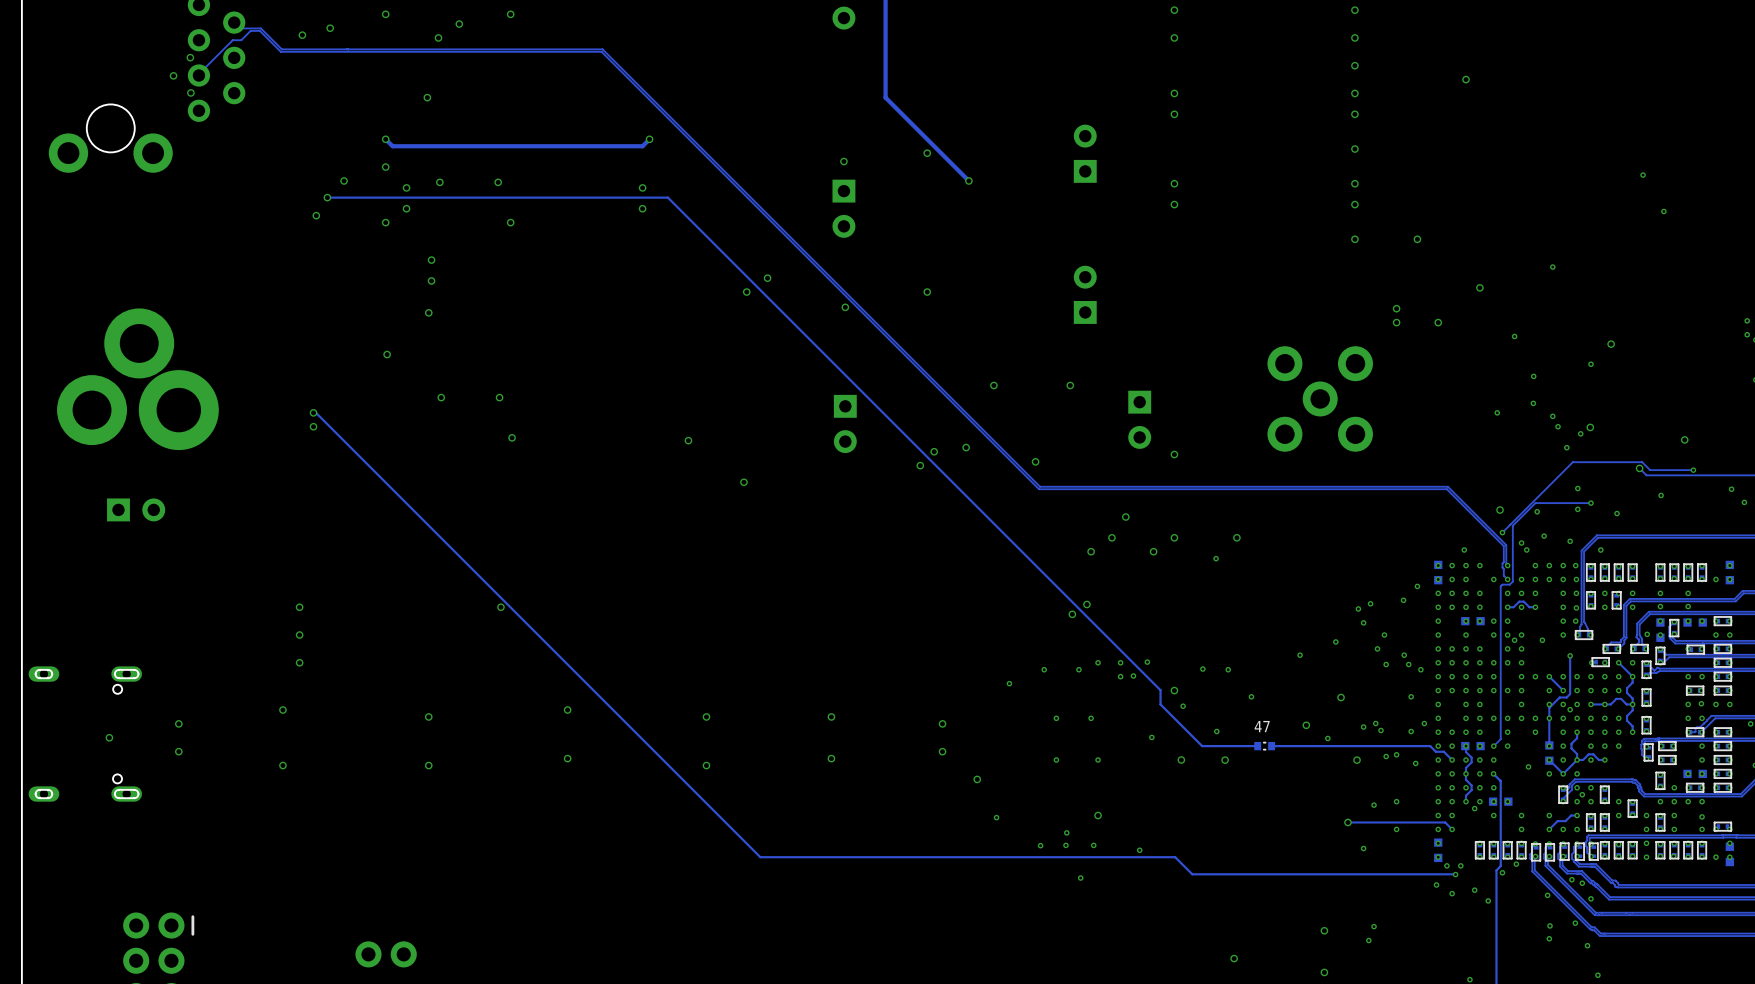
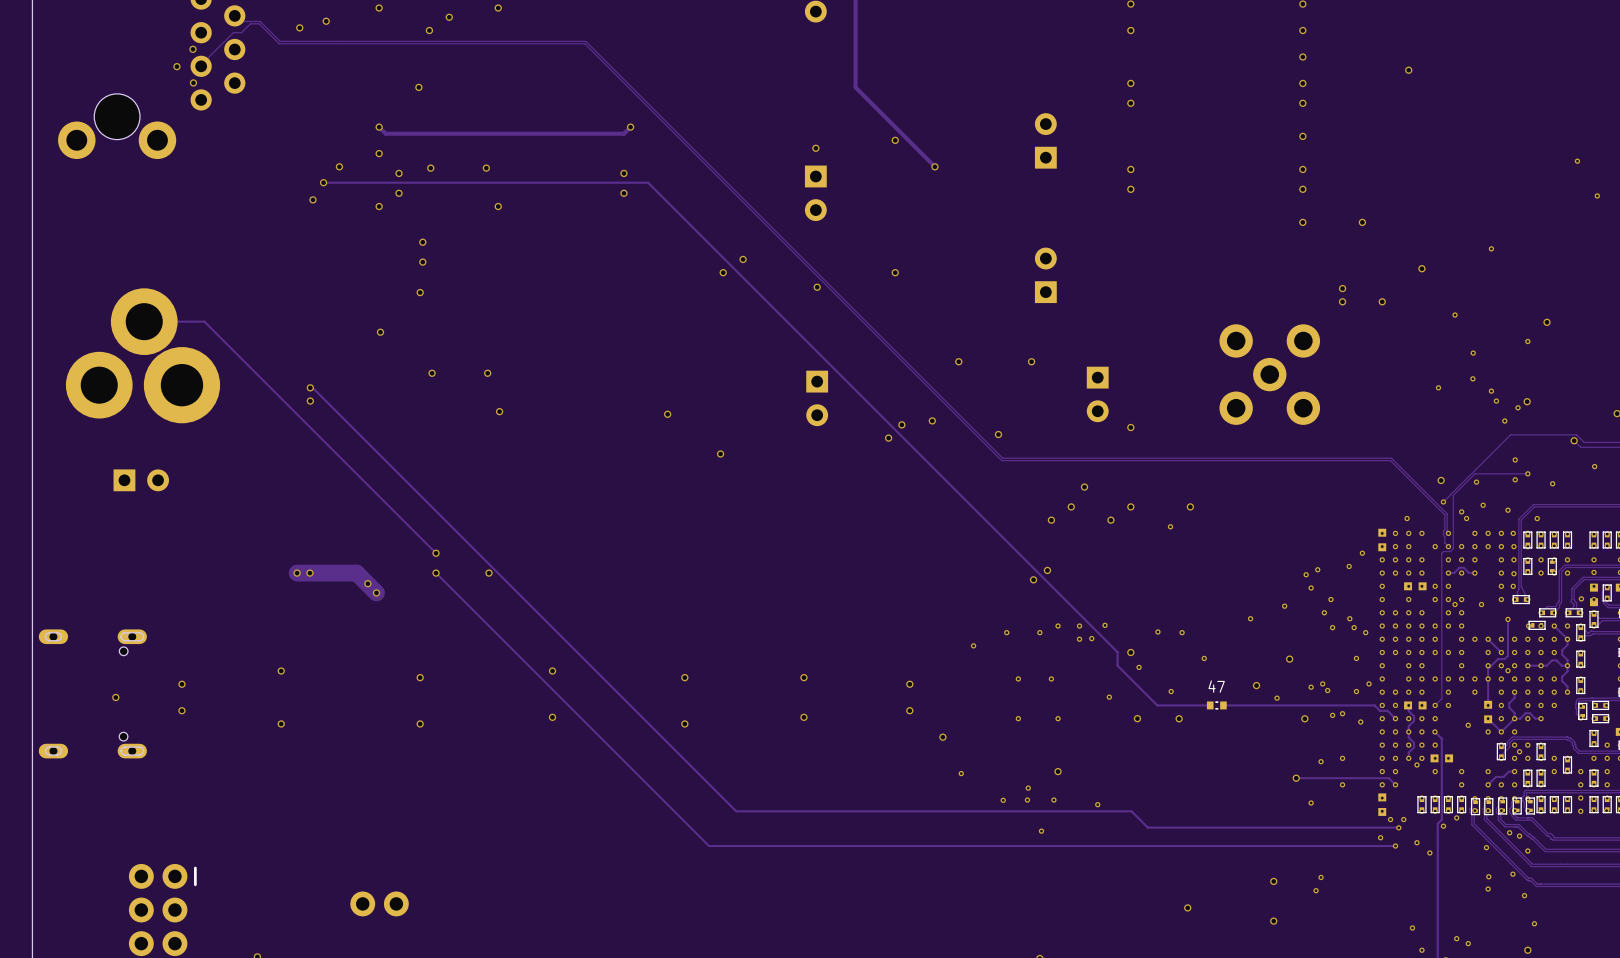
track: none -> (144, 321) (204, 321) (436, 553)
via: none -> (436, 553)
track: none -> (297, 573) (356, 573) (376, 592)
via: none -> (309, 573)
track: none -> (436, 573) (708, 846) (1395, 846)
via: none -> (436, 573)
via: none -> (367, 583)
via: none -> (376, 592)
via: (299, 635) -> none
via: (299, 662) -> none

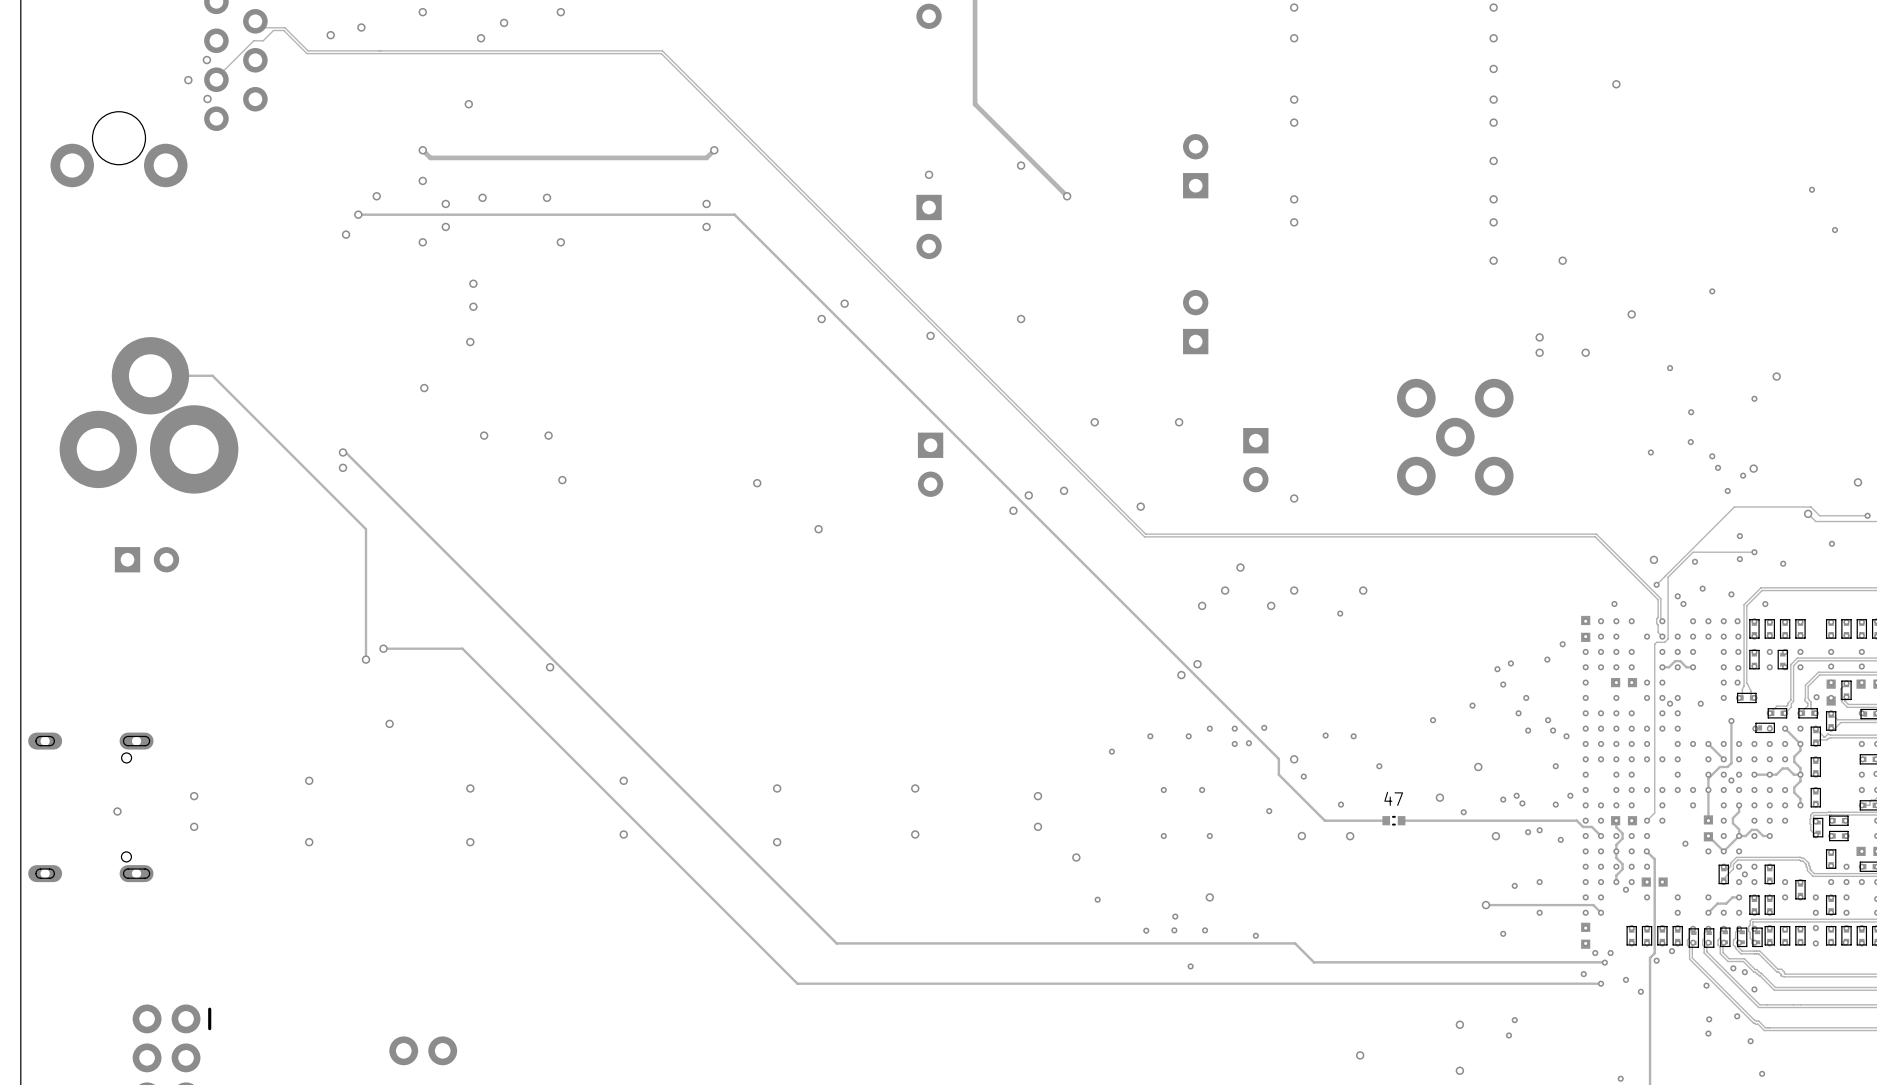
track: (197, 321) (204, 321) (436, 553) -> (212, 375) (366, 529) (366, 659)
via: (436, 553) -> none
via: none -> (383, 648)
via: none -> (366, 659)
track: (297, 573) (356, 573) (376, 592) -> none
via: (297, 573) -> none
via: (309, 573) -> none
track: (436, 573) (708, 846) -> (383, 648) (462, 648) (797, 983) (805, 983)
via: (436, 573) -> none
via: (367, 583) -> none
via: (376, 592) -> none
via: none -> (389, 723)

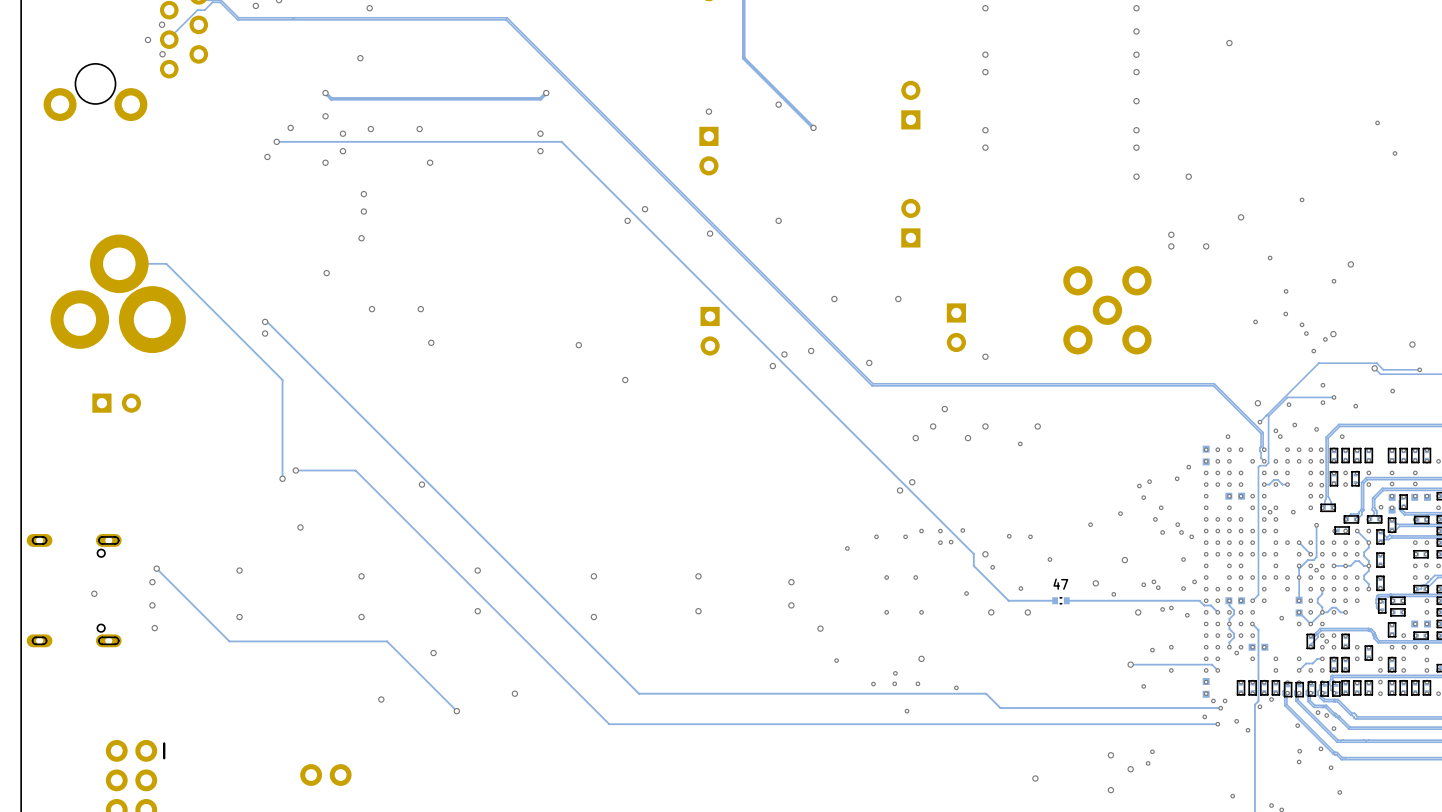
track: none -> (156, 568) (229, 641) (387, 641) (456, 711)
via: none -> (156, 568)
via: none -> (154, 628)
via: none -> (433, 653)
via: none -> (514, 693)
via: none -> (381, 699)
via: none -> (456, 711)
via: none -> (1130, 769)

